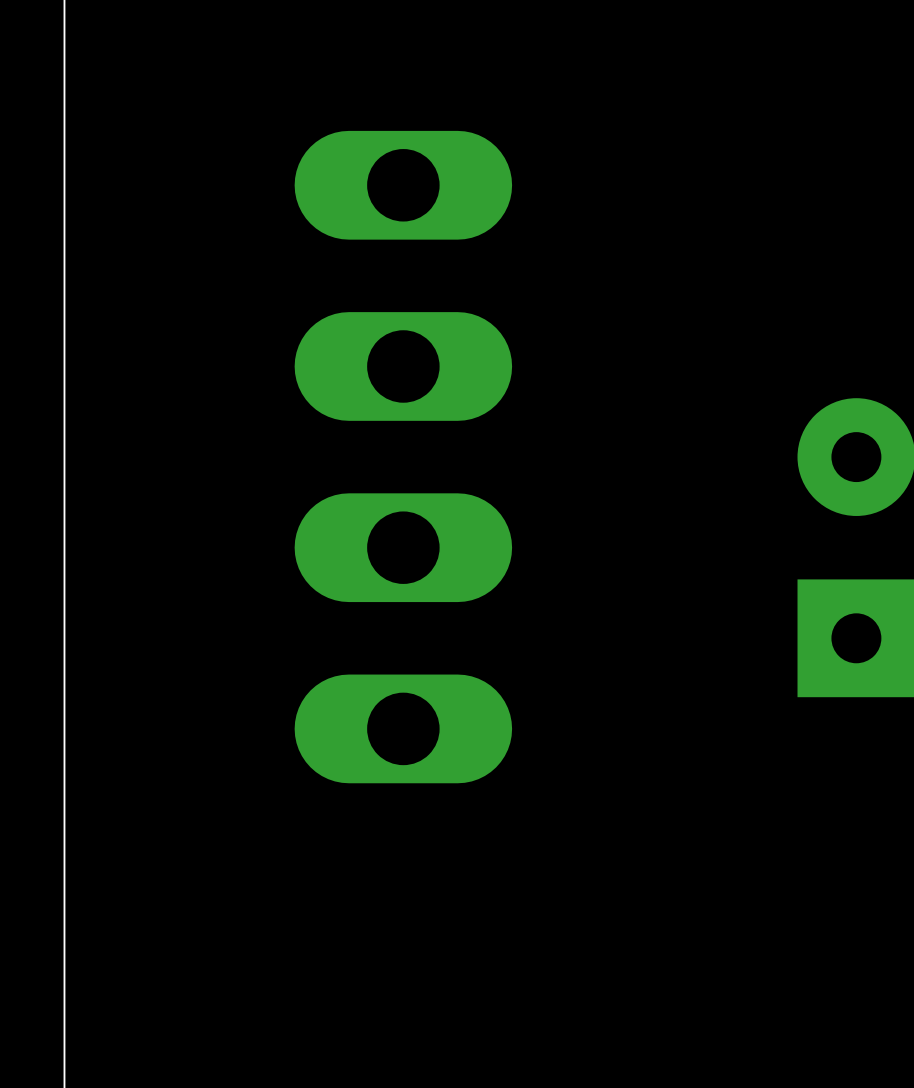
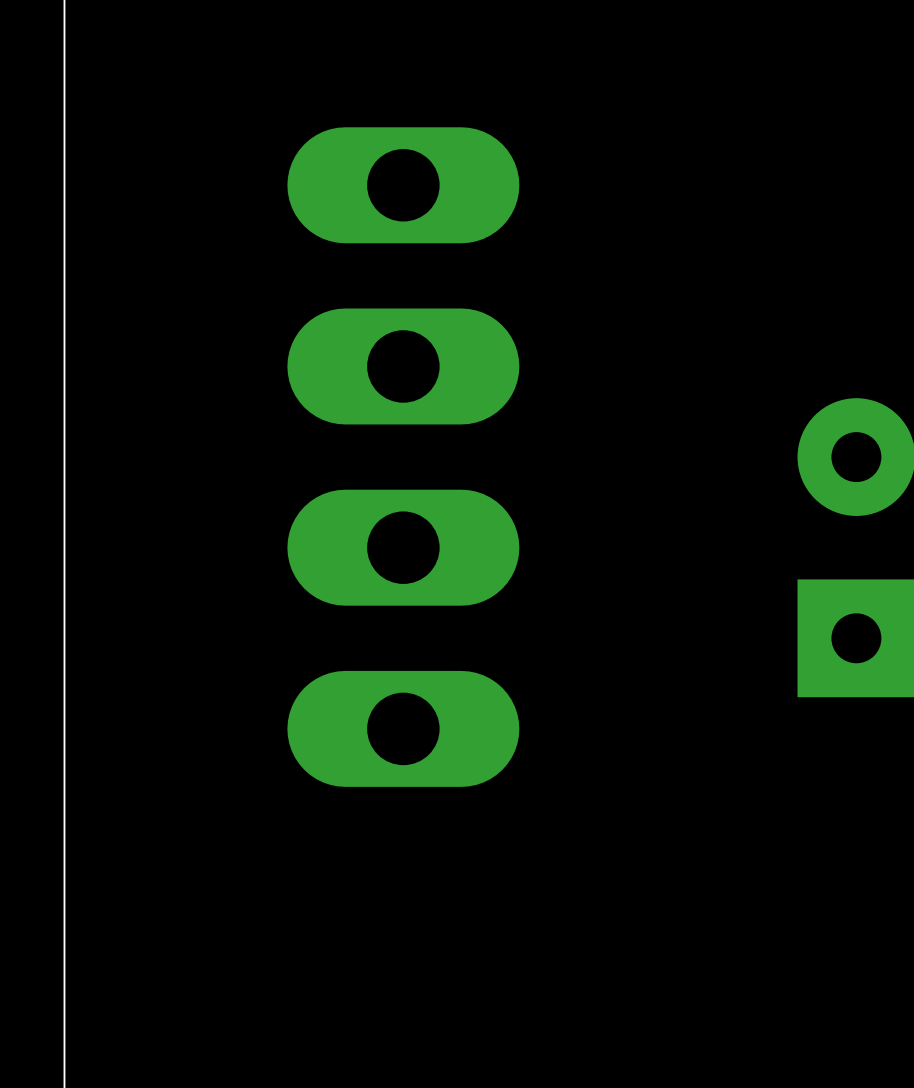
part footprint: [294, 130, 513, 784] -> [287, 127, 520, 787]

